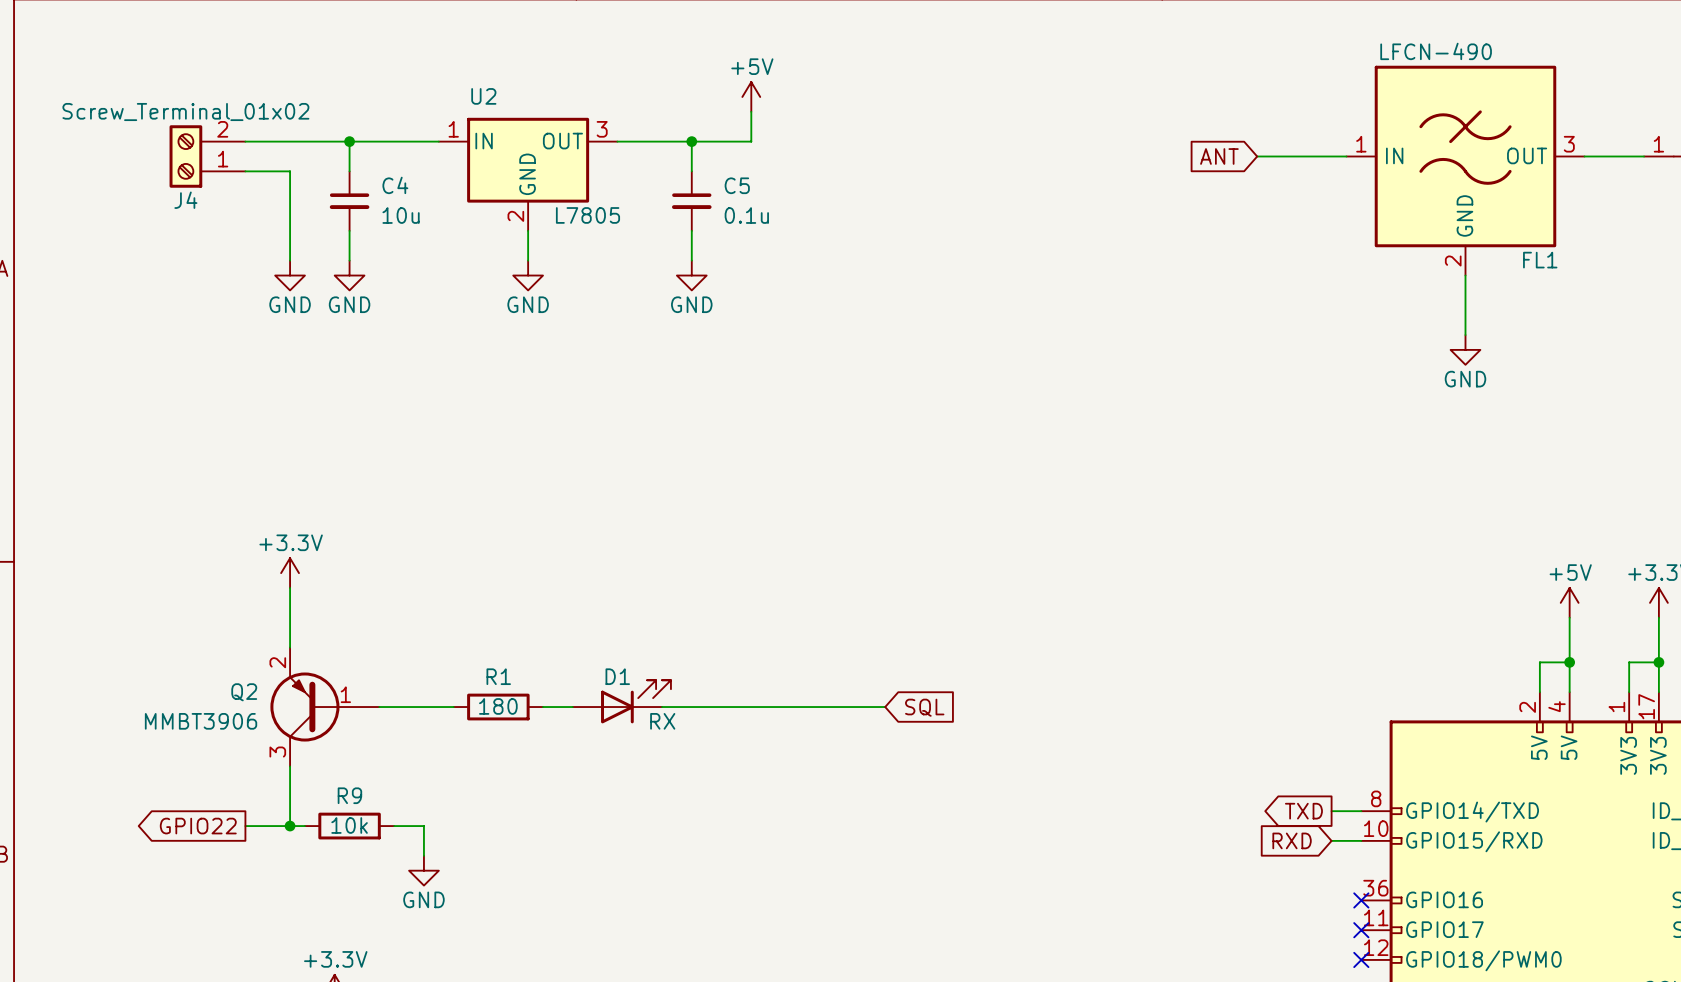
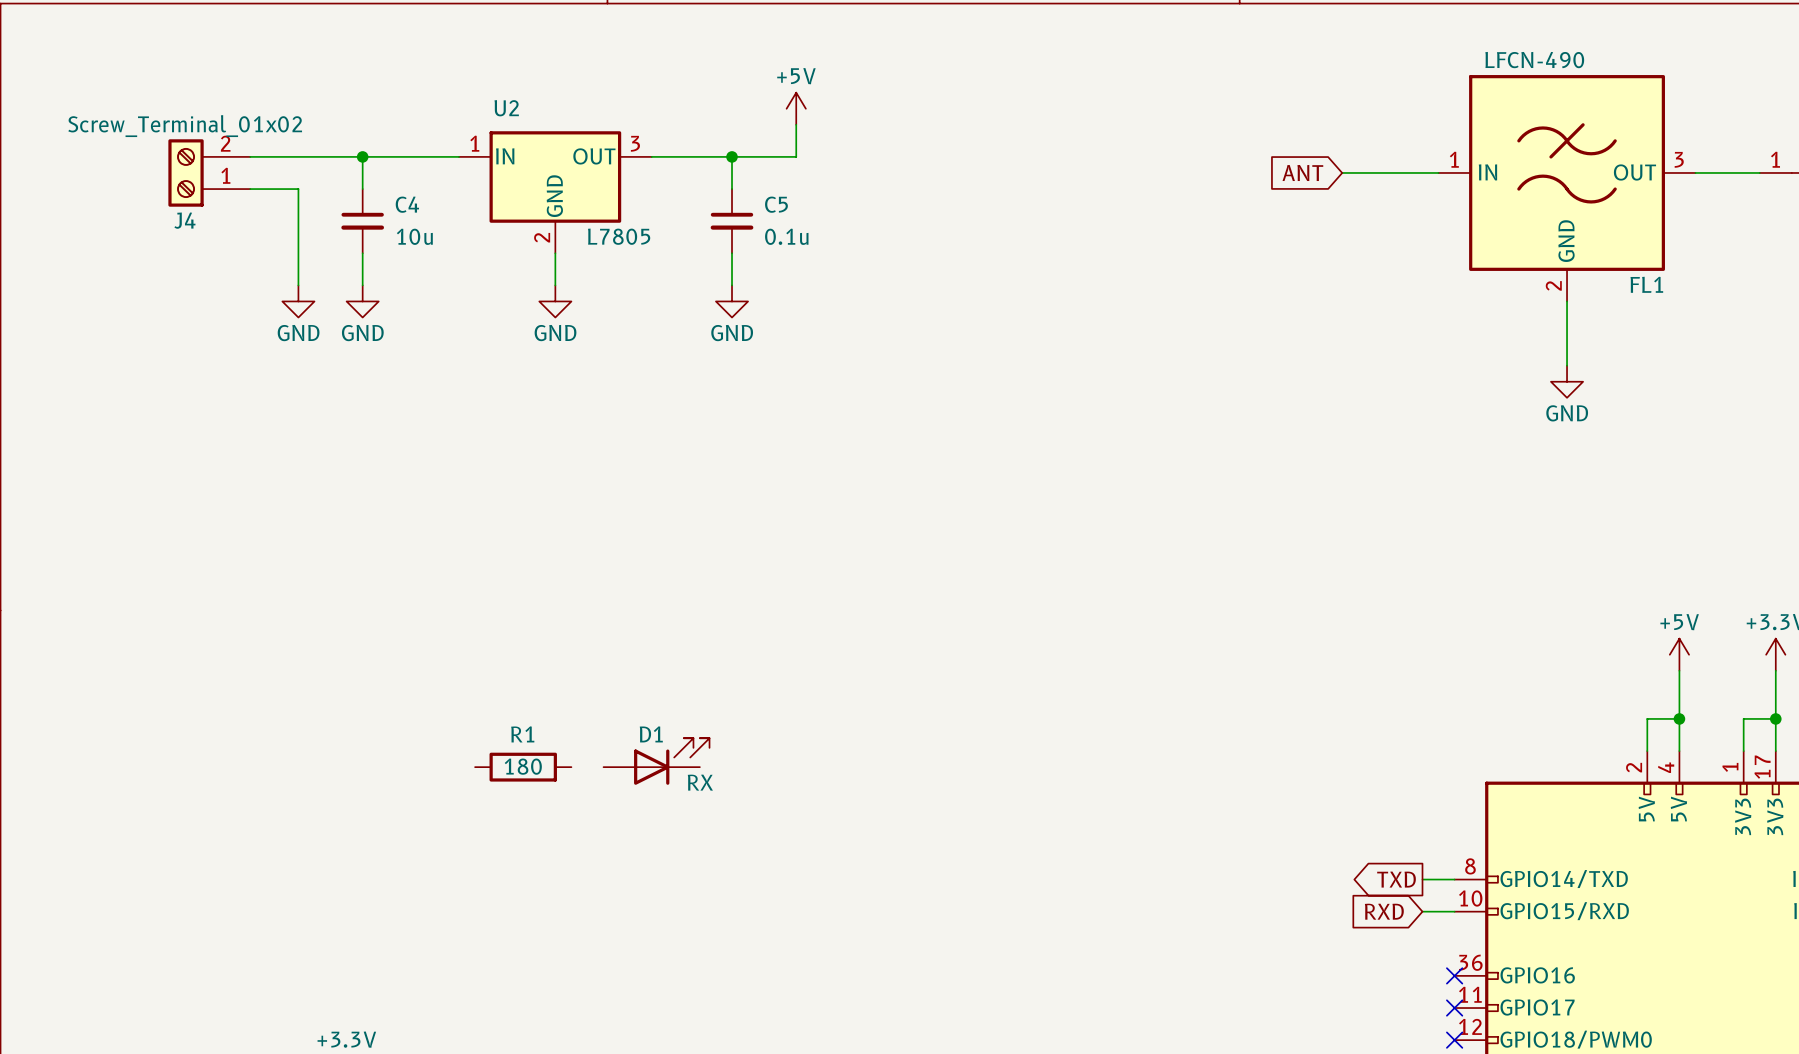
power symbol: +3.3V (290, 573) -> none
wire: (290, 587) (290, 647) -> none
Q2: MMBT3906 (324, 707) -> none
wire: (379, 707) (453, 707) -> none
wire: (543, 707) (572, 707) -> none
wire: (662, 707) (885, 707) -> none
global label: SQL (924, 707) -> none
wire: (290, 766) (290, 826) -> none
global label: GPIO22 (198, 826) -> none
wire: (245, 826) (304, 826) -> none
junction: (290, 826) -> none
R9: 10k (349, 826) -> none
wire: (394, 826) (423, 826) (423, 855) -> none
power symbol: GND (423, 870) -> none

